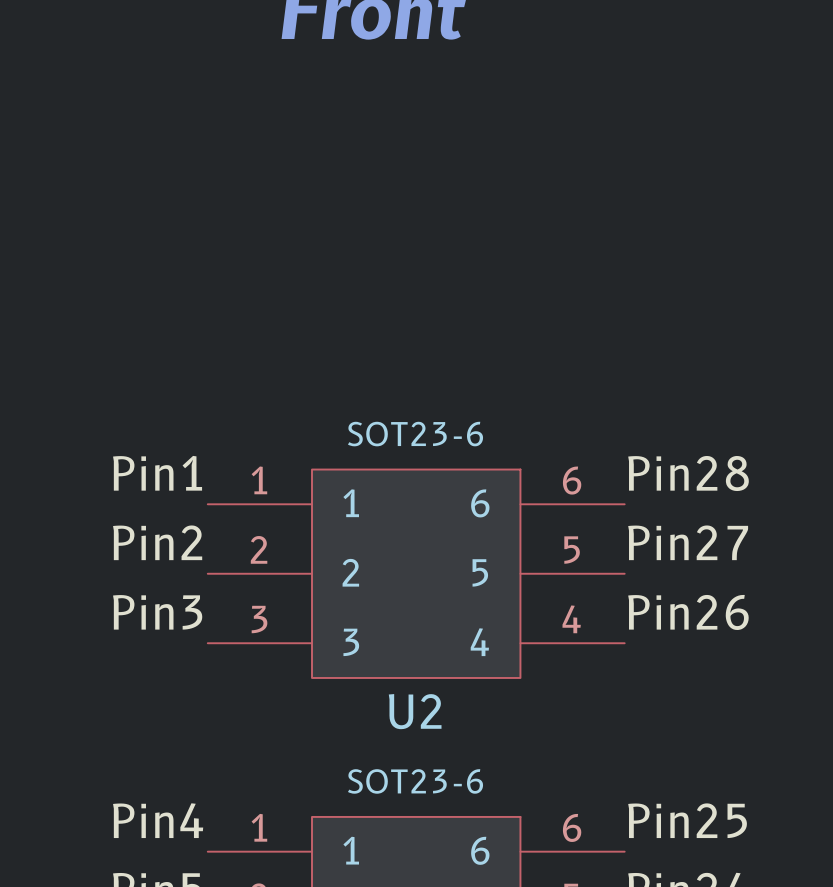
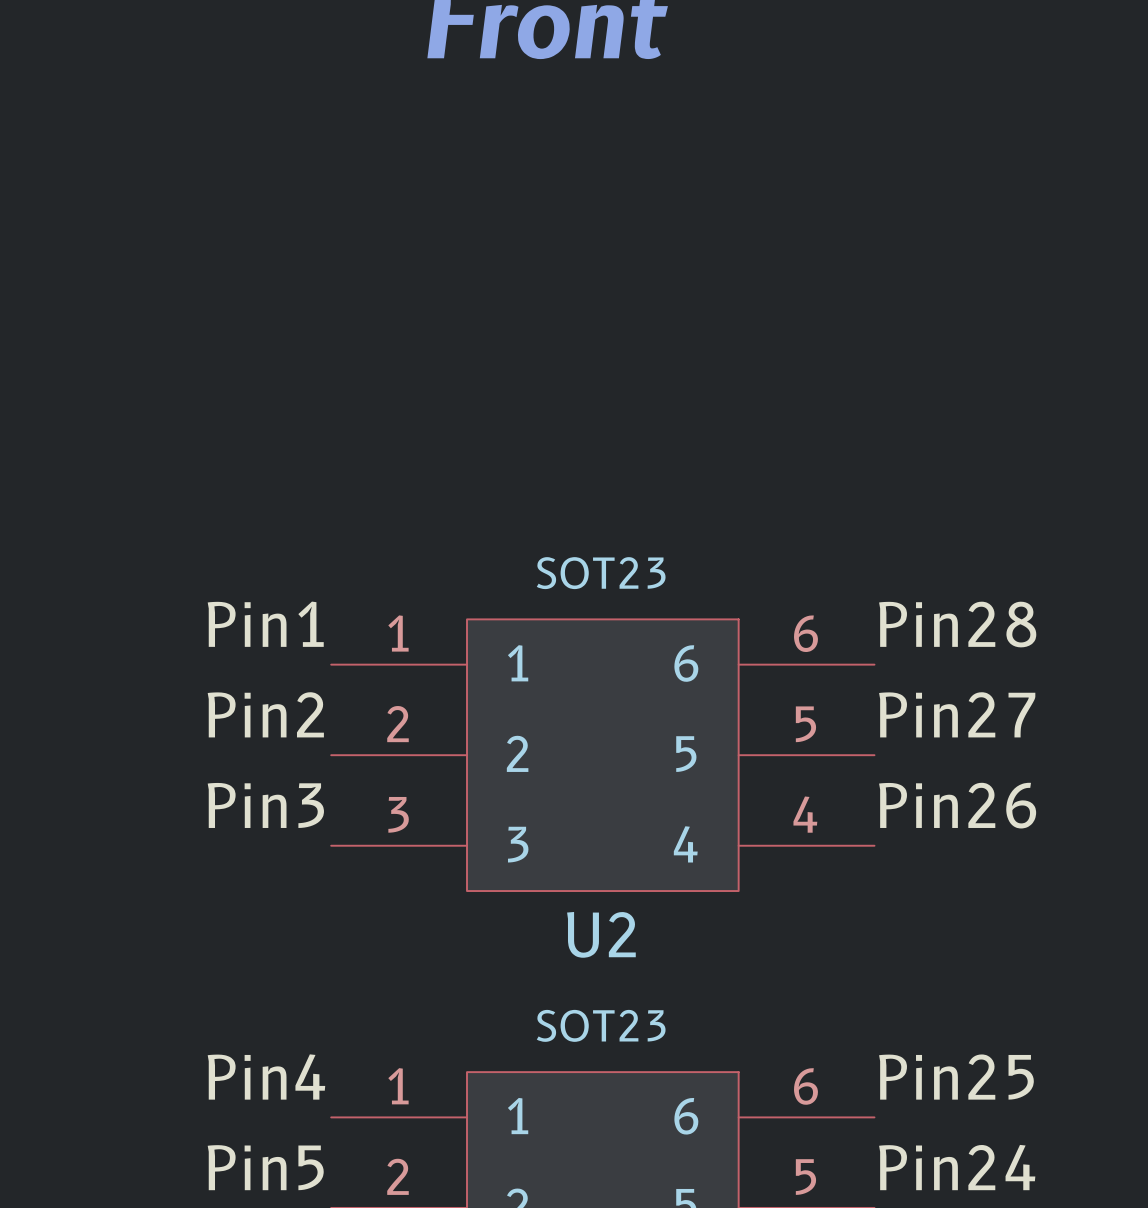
U2 value: SOT23-6 (415, 434) -> SOT23 (601, 573)
part value: SOT23-6 (415, 781) -> SOT23 (601, 1025)

